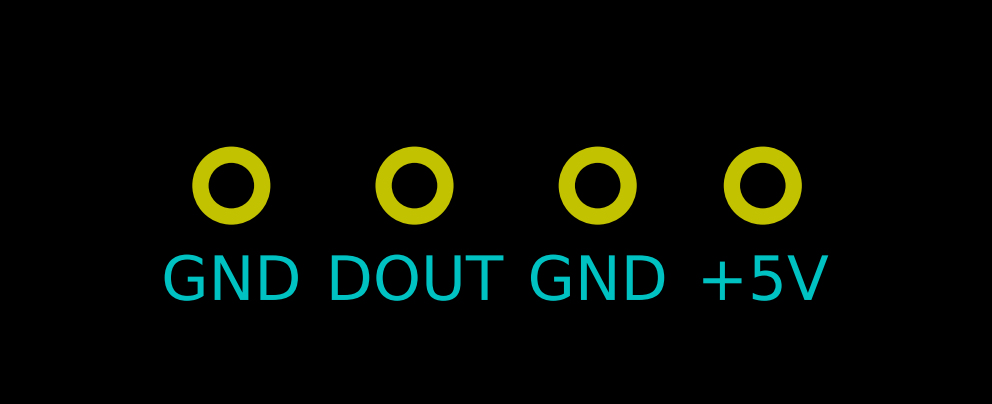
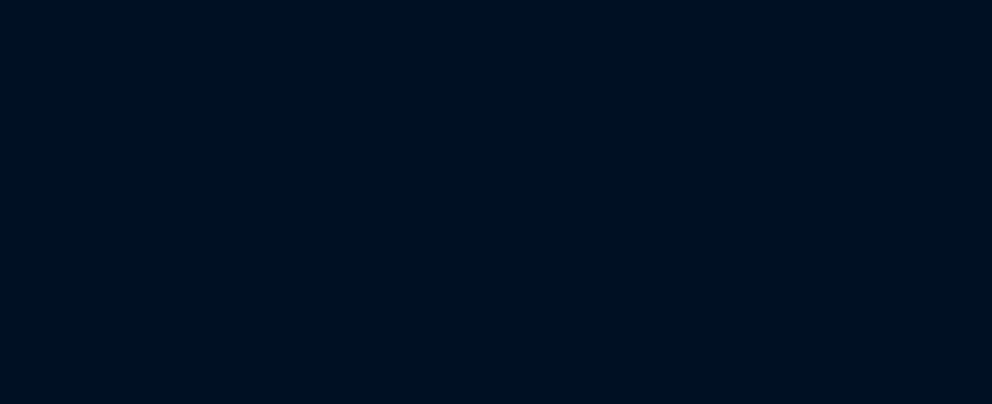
part: GND (231, 185) -> none
part: DOUT (414, 185) -> none
part: GND (597, 185) -> none
part: +5V (762, 185) -> none

